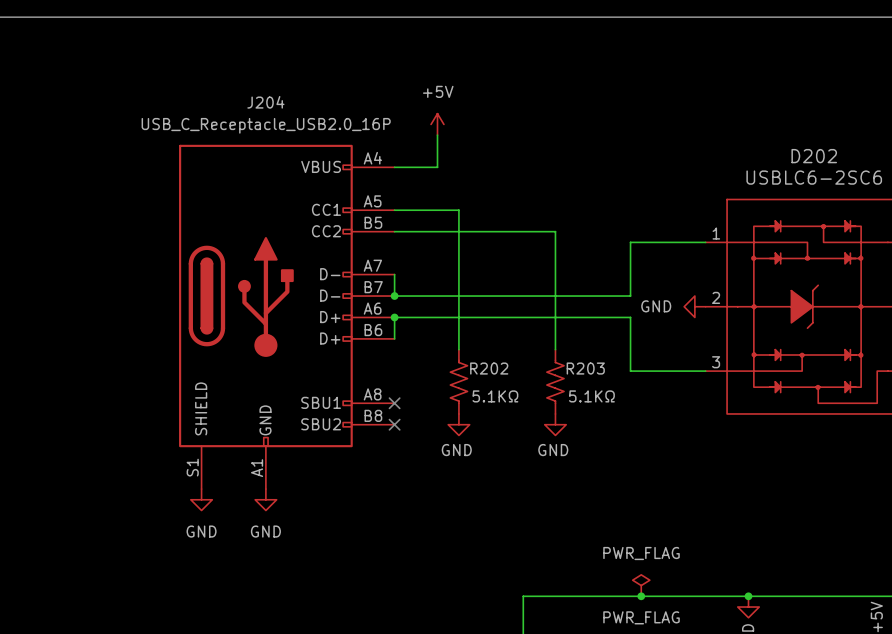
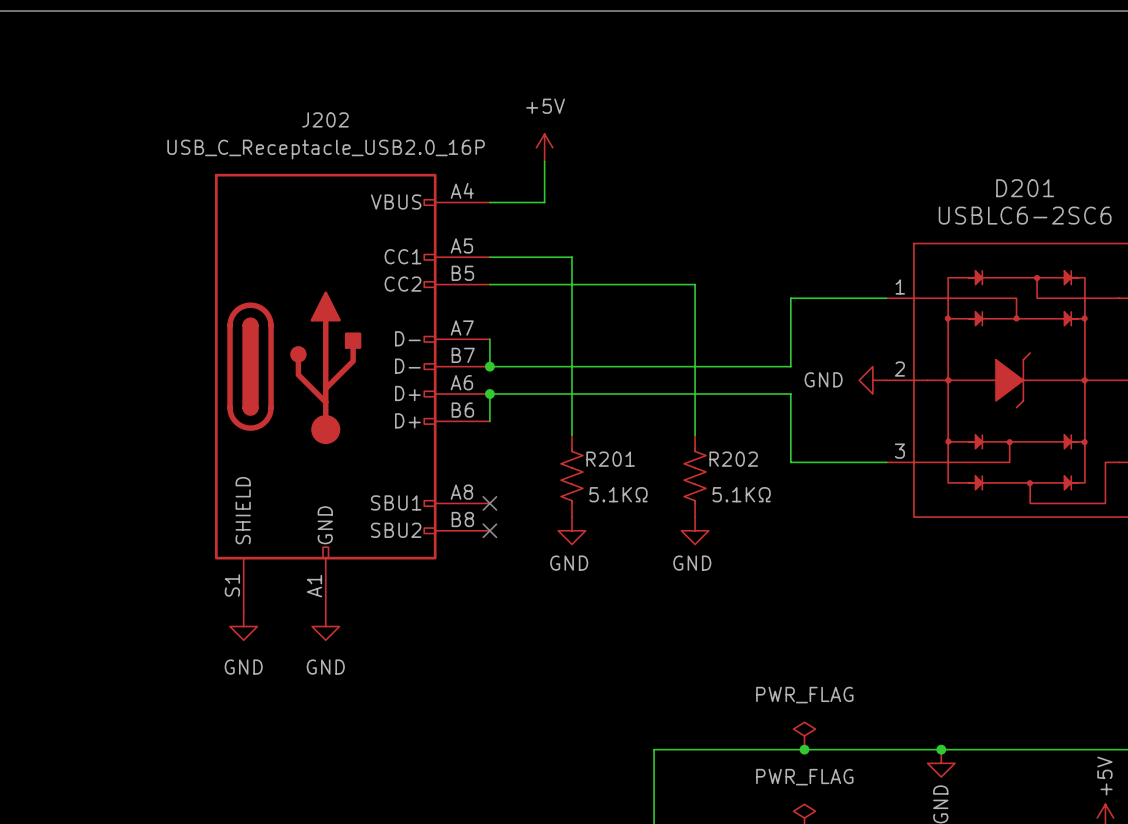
J204 name: J204 (265, 102) -> J202 (325, 119)
D202 name: D202 (814, 156) -> D201 (1025, 188)
R202 name: R202 (489, 368) -> R201 (610, 459)
R203 name: R203 (585, 368) -> R202 (733, 459)

